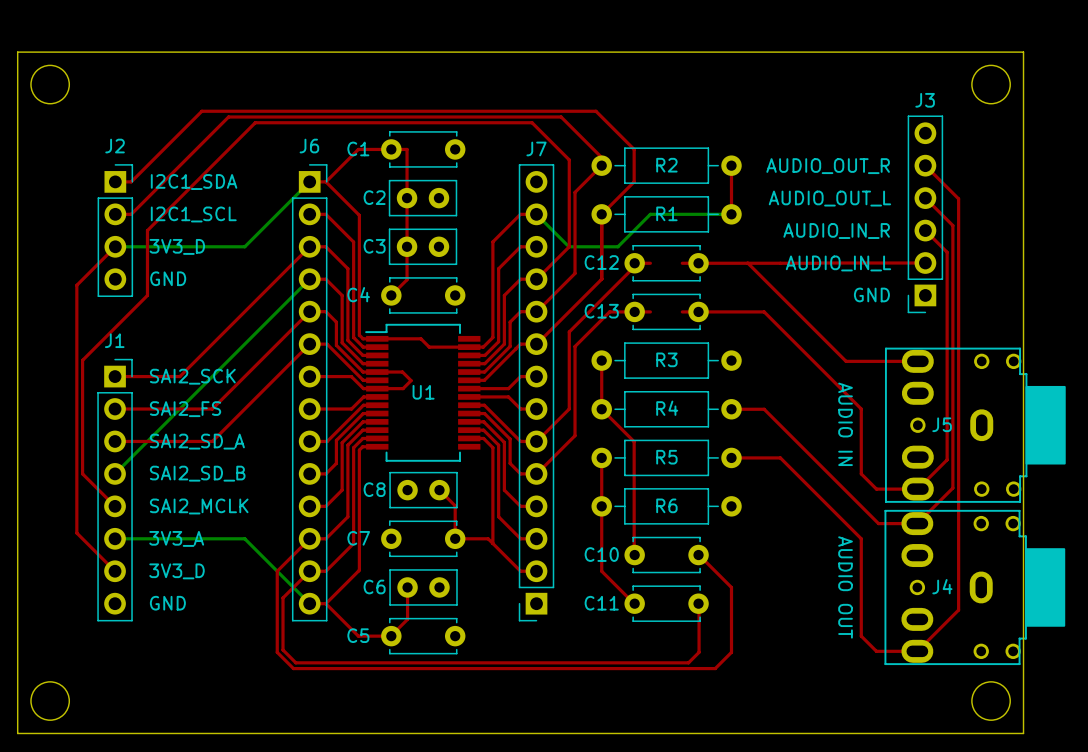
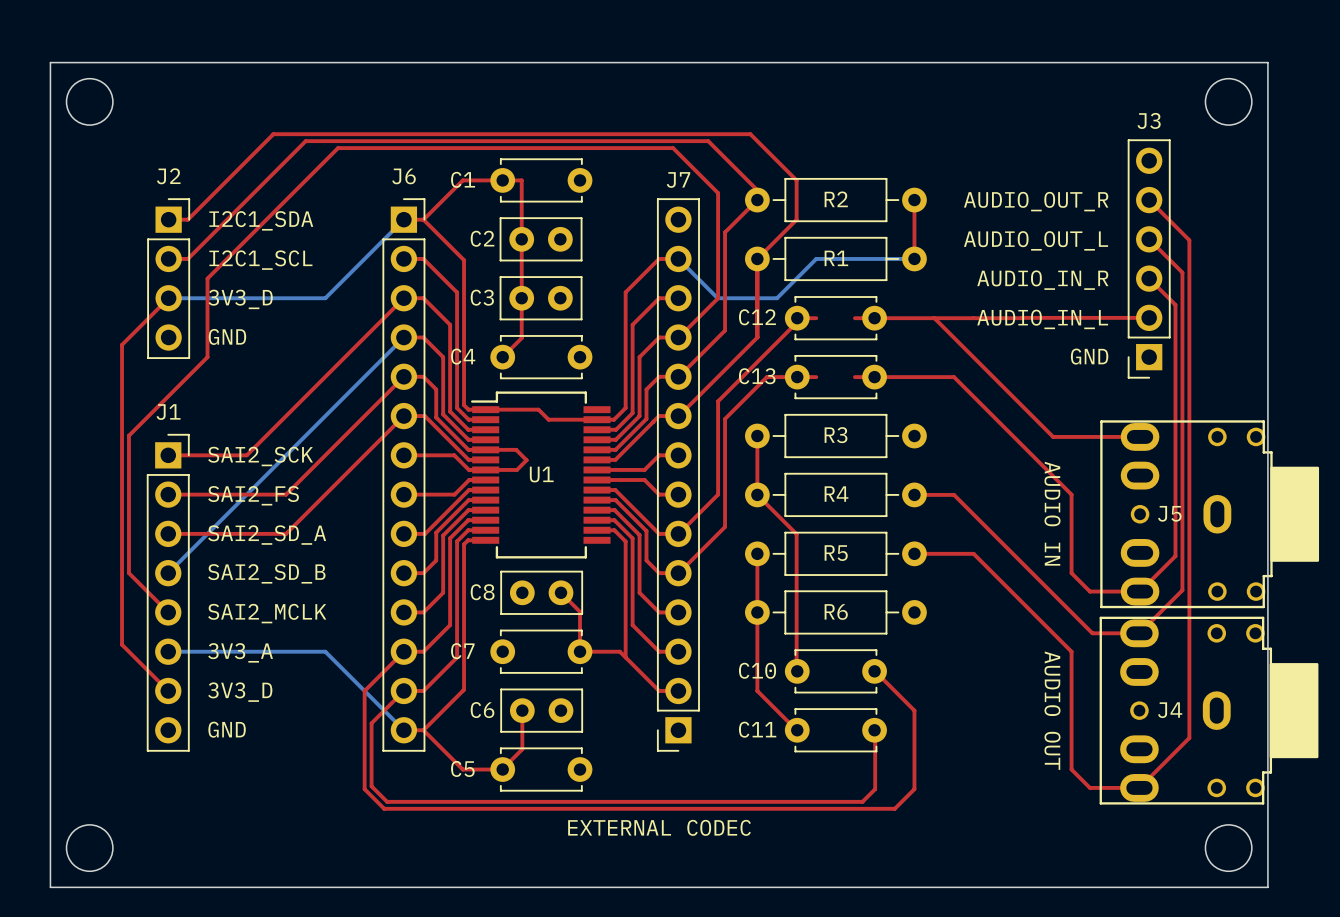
text: none -> EXTERNAL CODEC (659, 827)

